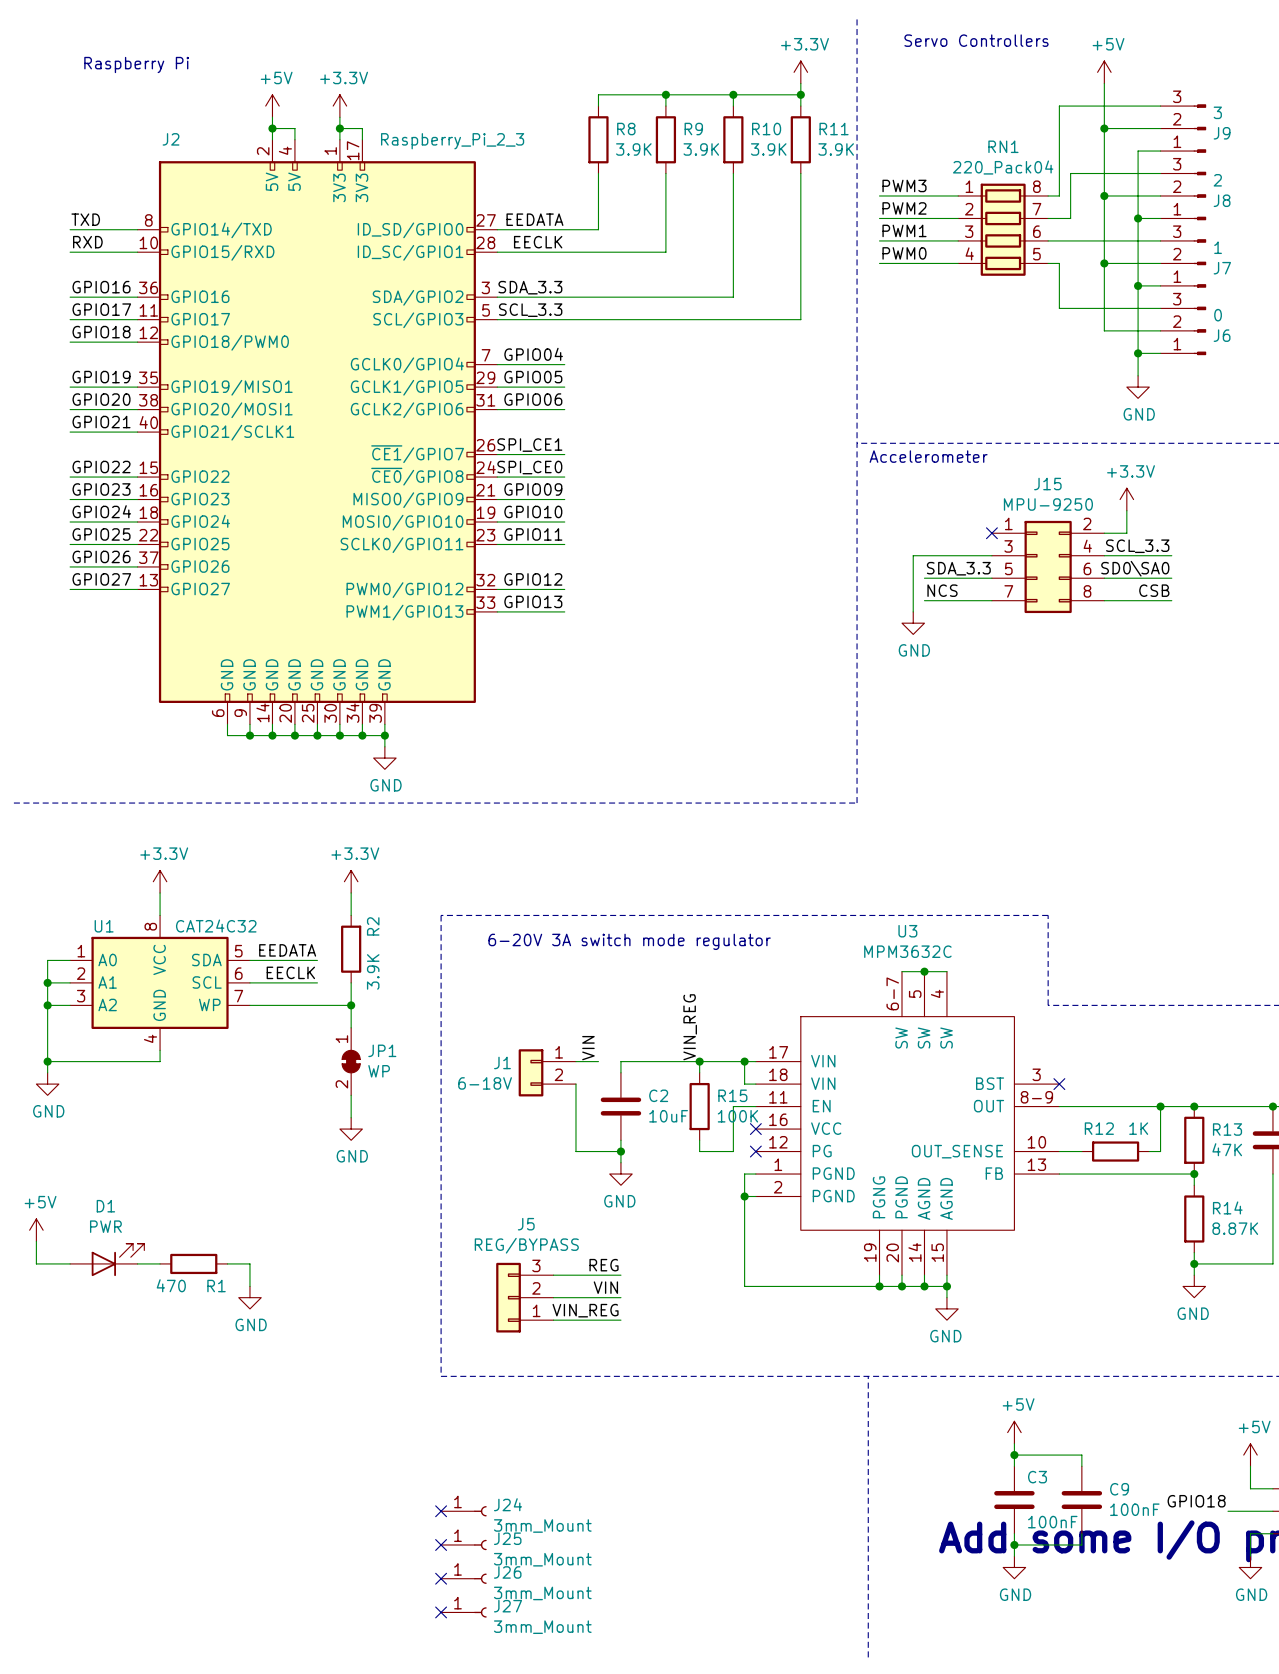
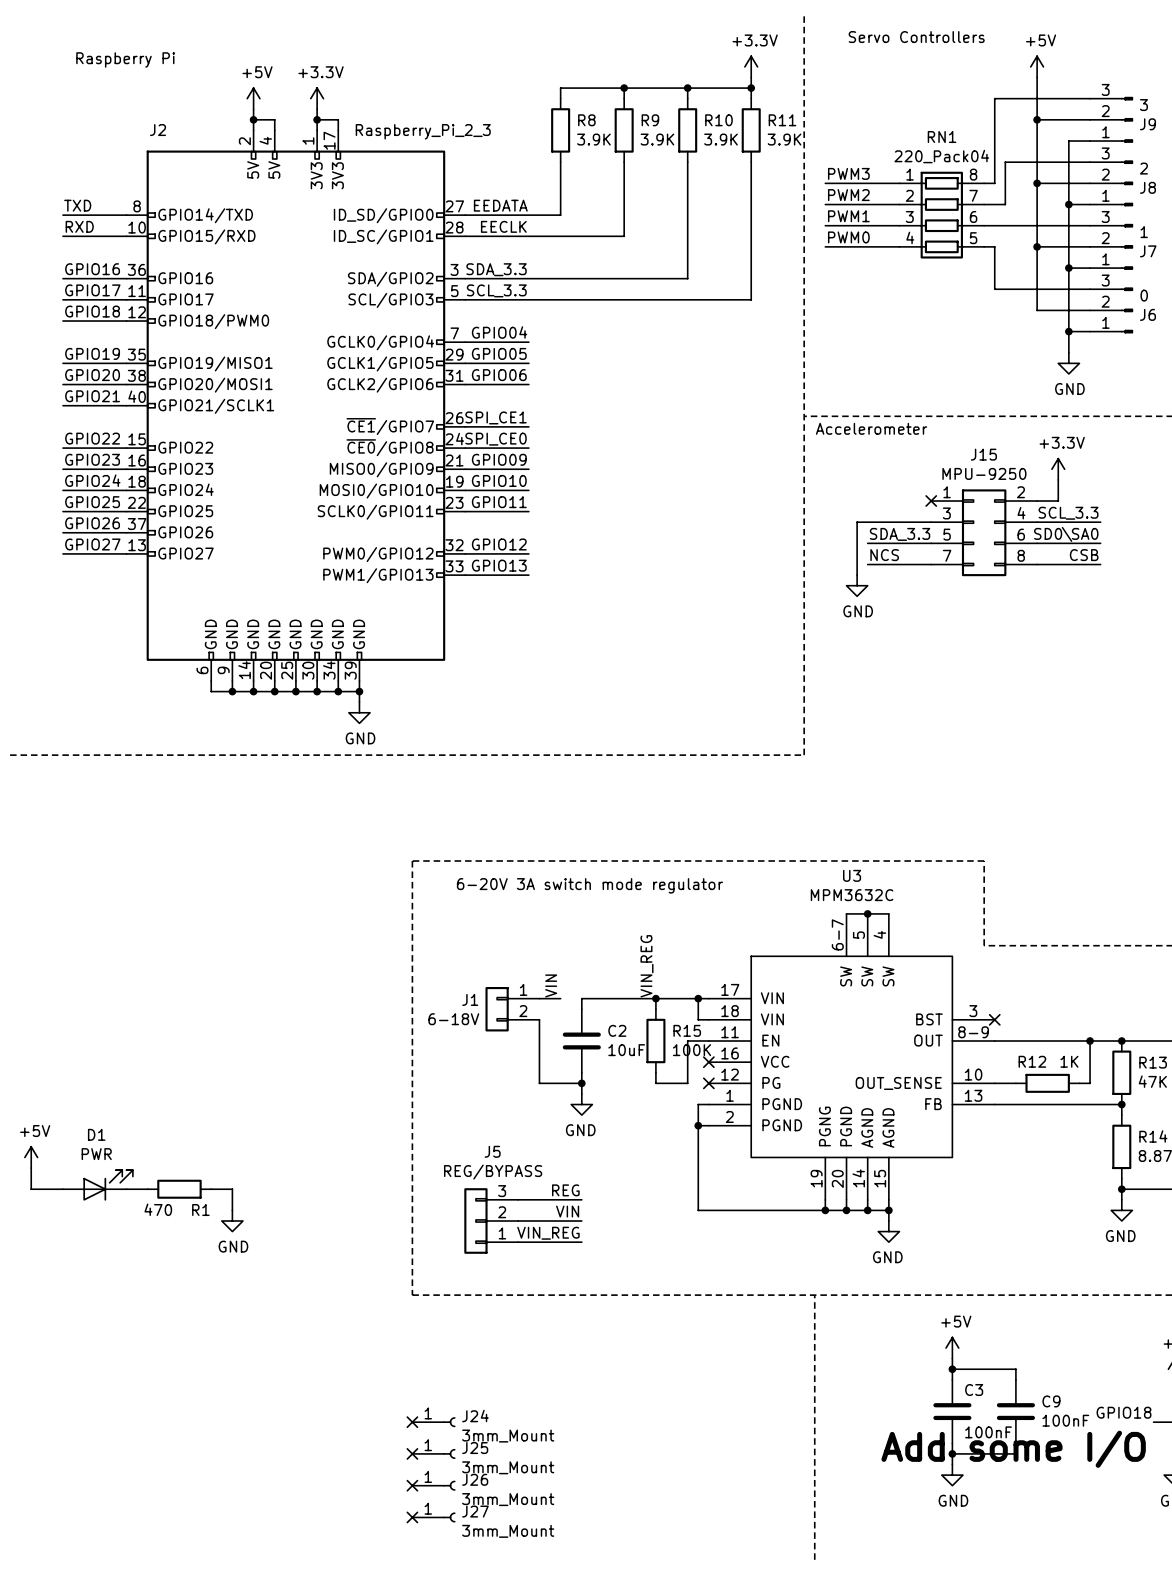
power symbol: +3.3V (160, 881) -> none
power symbol: +3.3V (351, 881) -> none
wire: (160, 892) (160, 915) -> none
wire: (351, 892) (351, 915) -> none
R2: 3.9K (351, 949) -> none
label: EEDATA (287, 950) -> none
wire: (70, 960) (47, 960) (47, 1072) -> none
wire: (249, 960) (317, 960) -> none
label: EECLK (290, 972) -> none
wire: (47, 982) (70, 982) -> none
junction: (47, 982) -> none
U1: CAT24C32 (160, 982) -> none
wire: (249, 982) (317, 982) -> none
wire: (351, 982) (351, 1027) -> none
wire: (47, 1005) (70, 1005) -> none
junction: (47, 1005) -> none
wire: (249, 1005) (351, 1005) -> none
junction: (351, 1005) -> none
wire: (160, 1050) (160, 1061) (47, 1061) -> none
junction: (47, 1061) -> none
JP1: WP (351, 1061) -> none
power symbol: GND (47, 1084) -> none
wire: (351, 1095) (351, 1117) -> none
power symbol: GND (351, 1129) -> none

